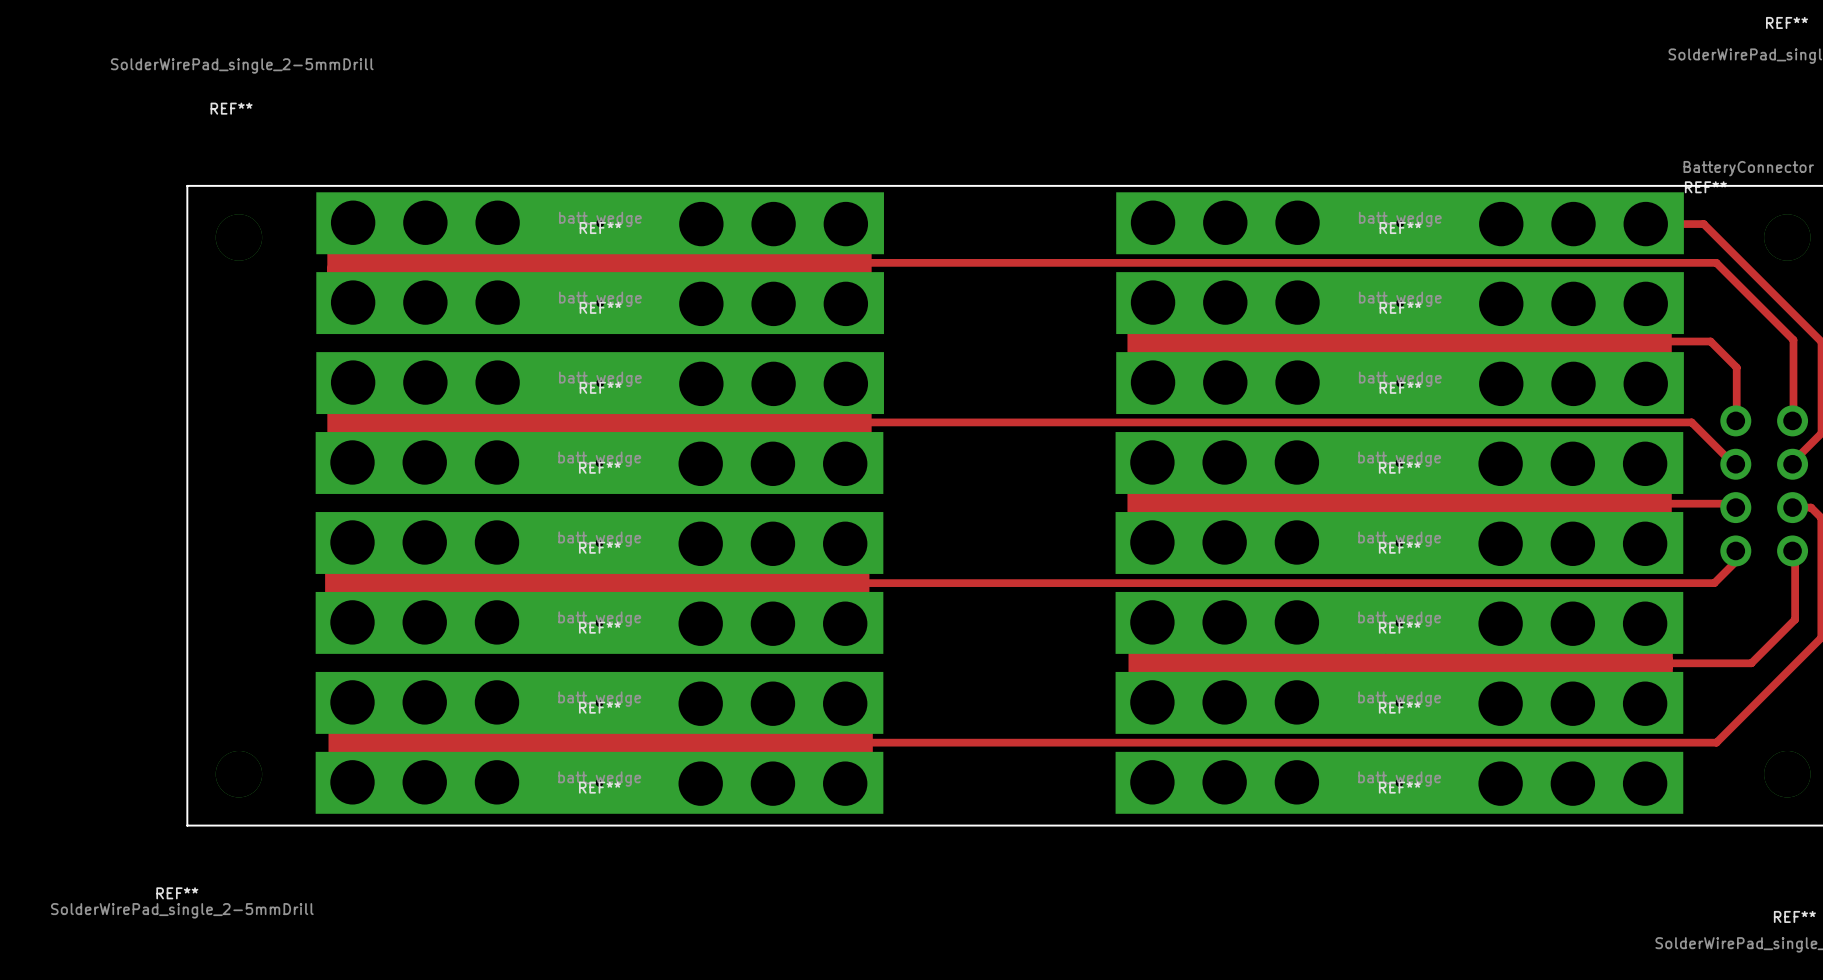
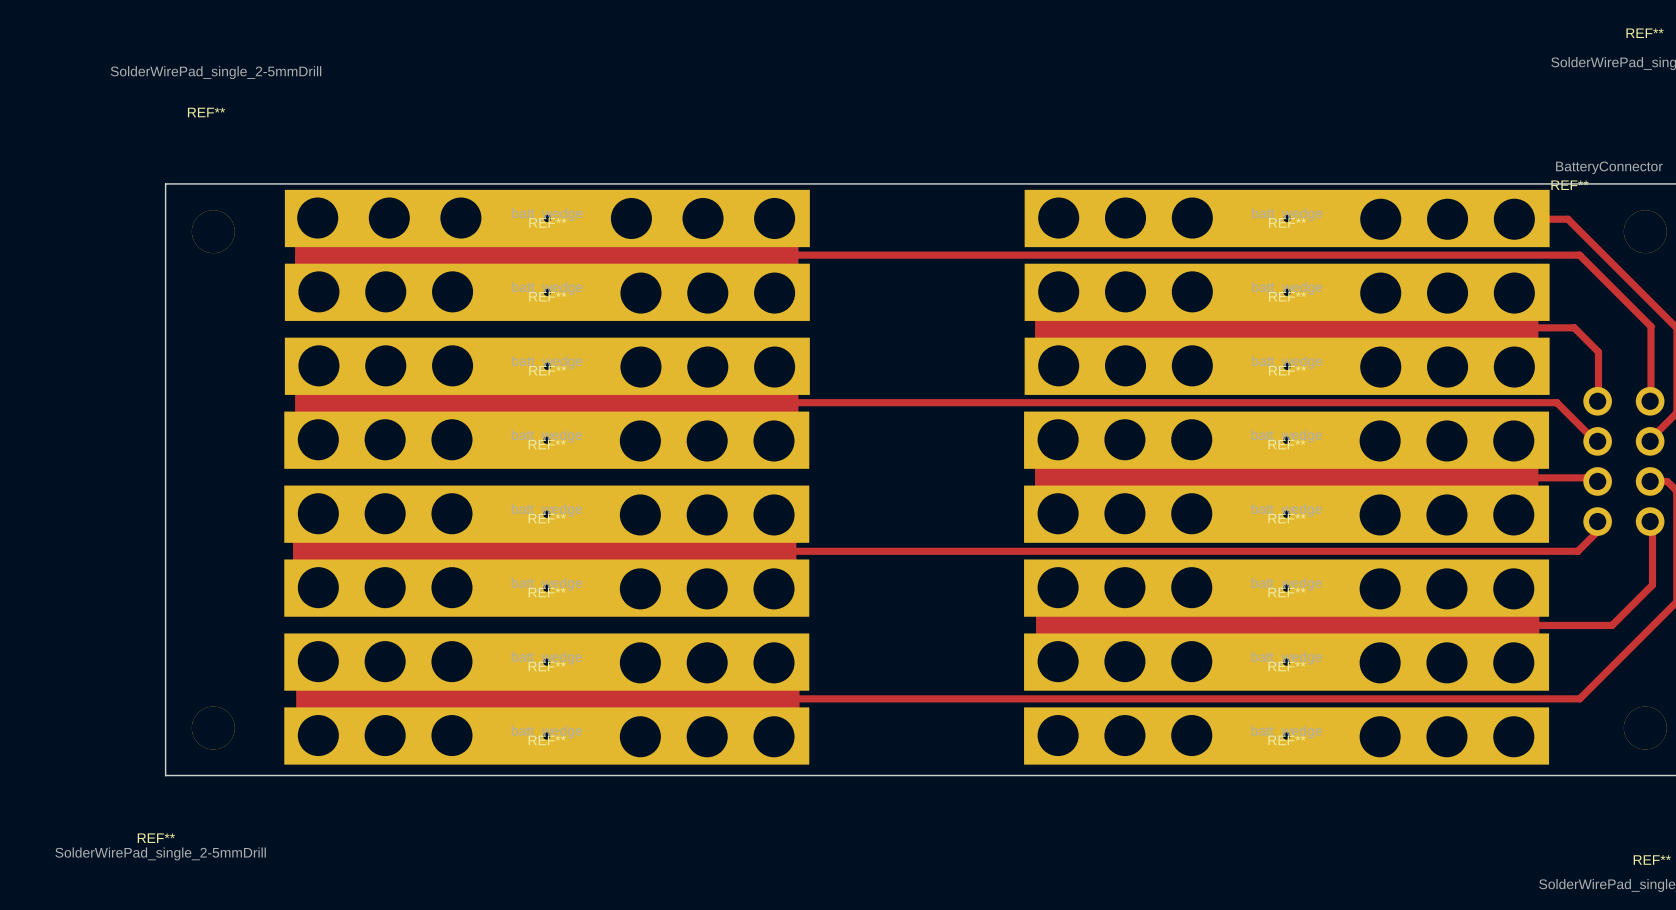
REF** footprint: [316, 192, 884, 255] -> [284, 189, 810, 248]

